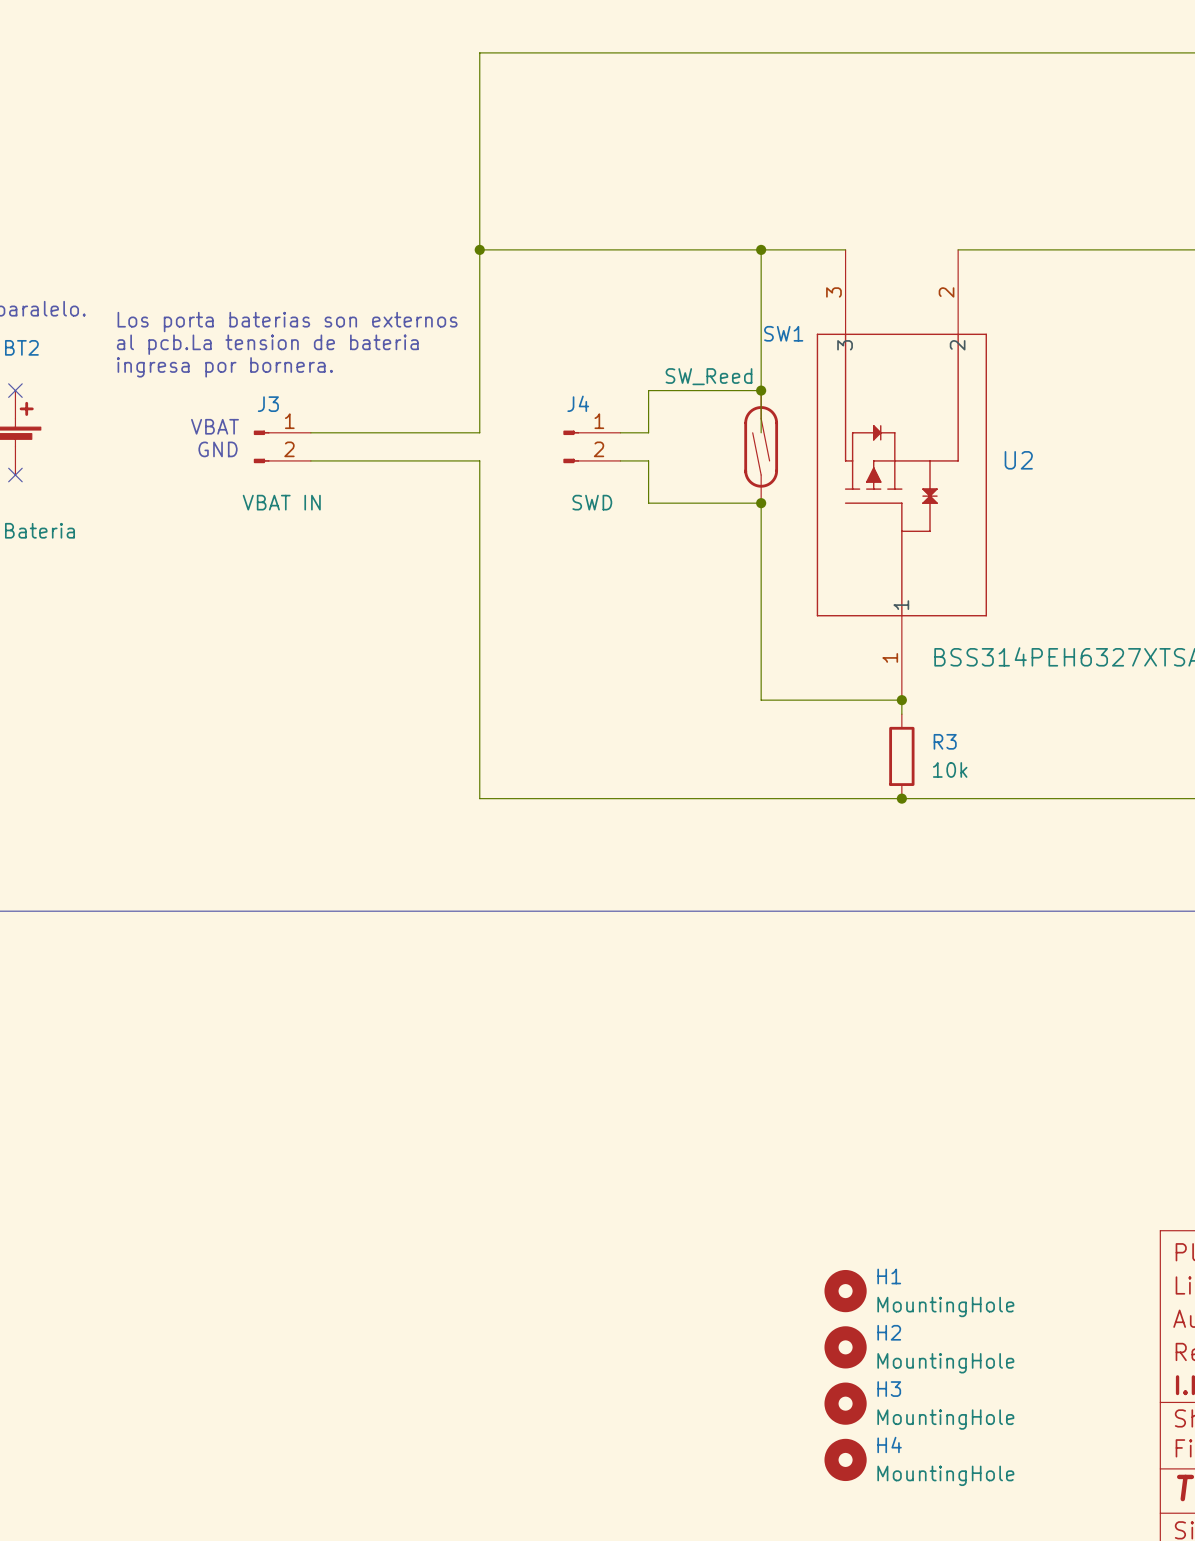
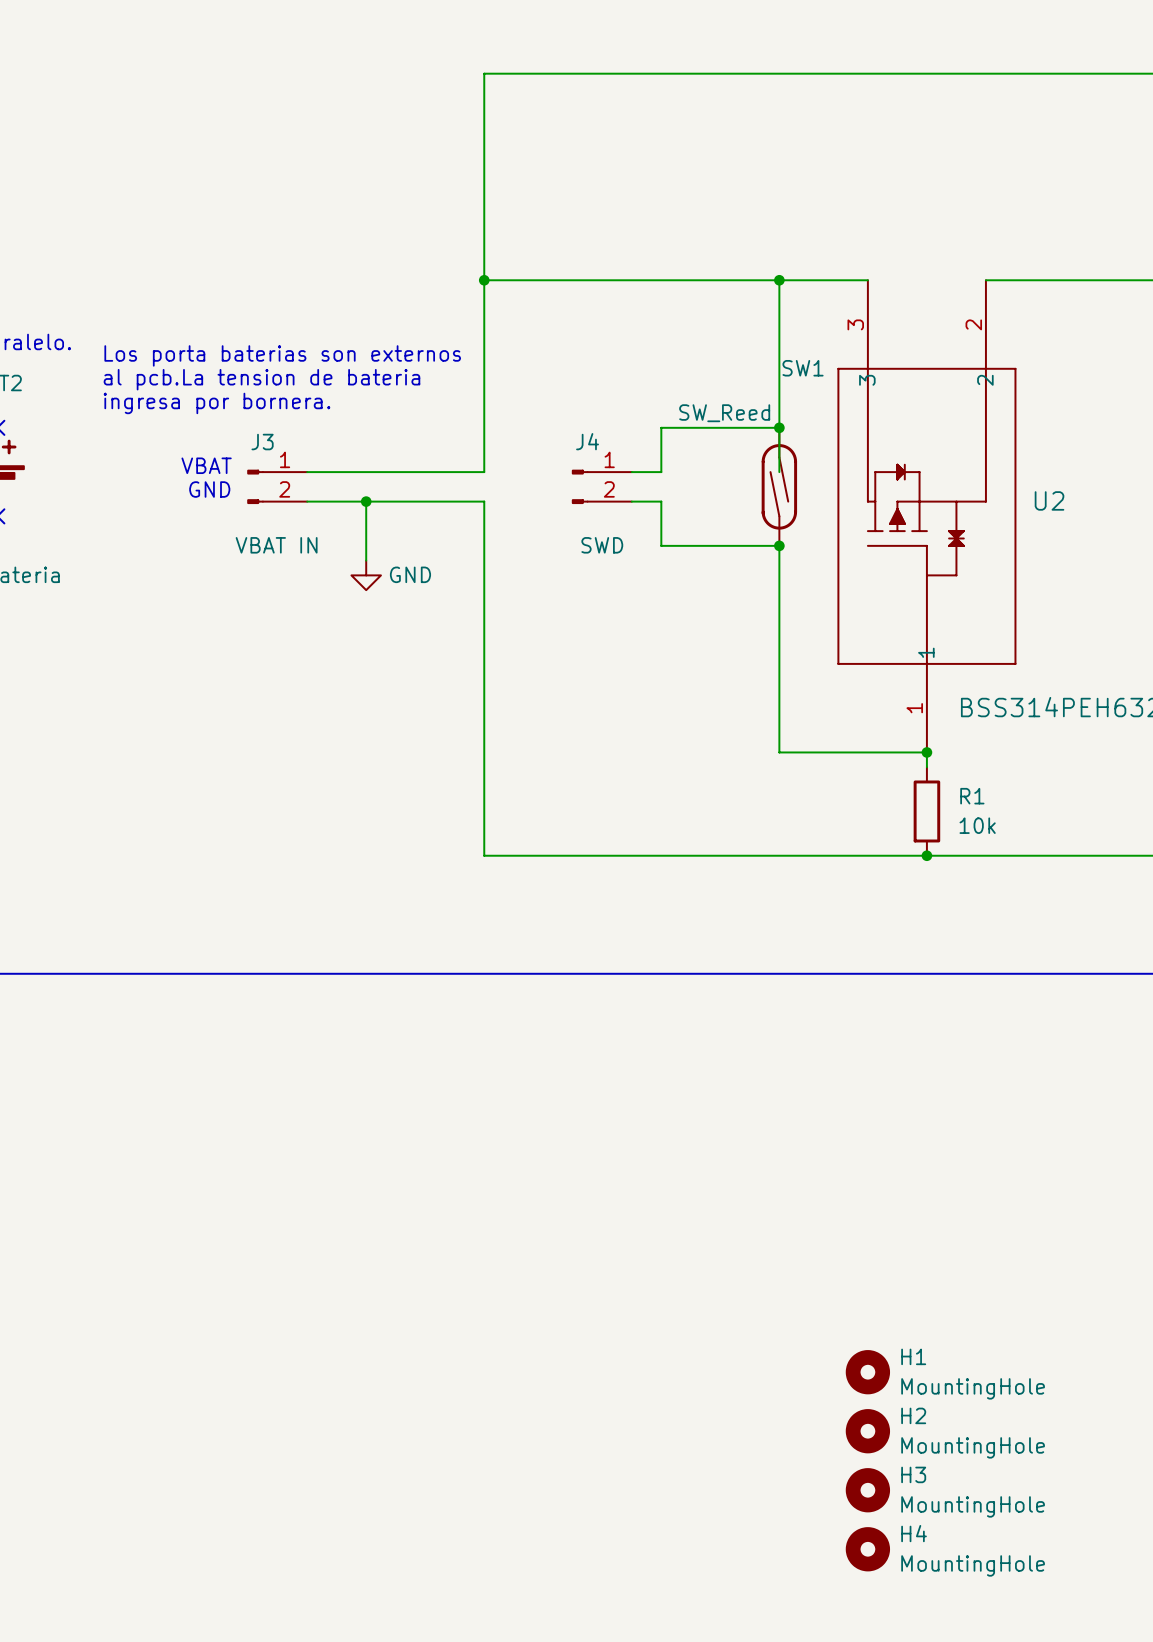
wire: none -> (366, 501) (366, 560)
junction: none -> (366, 501)
power symbol: none -> GND (366, 575)
R3 name: R3 (945, 741) -> R1 (972, 796)

